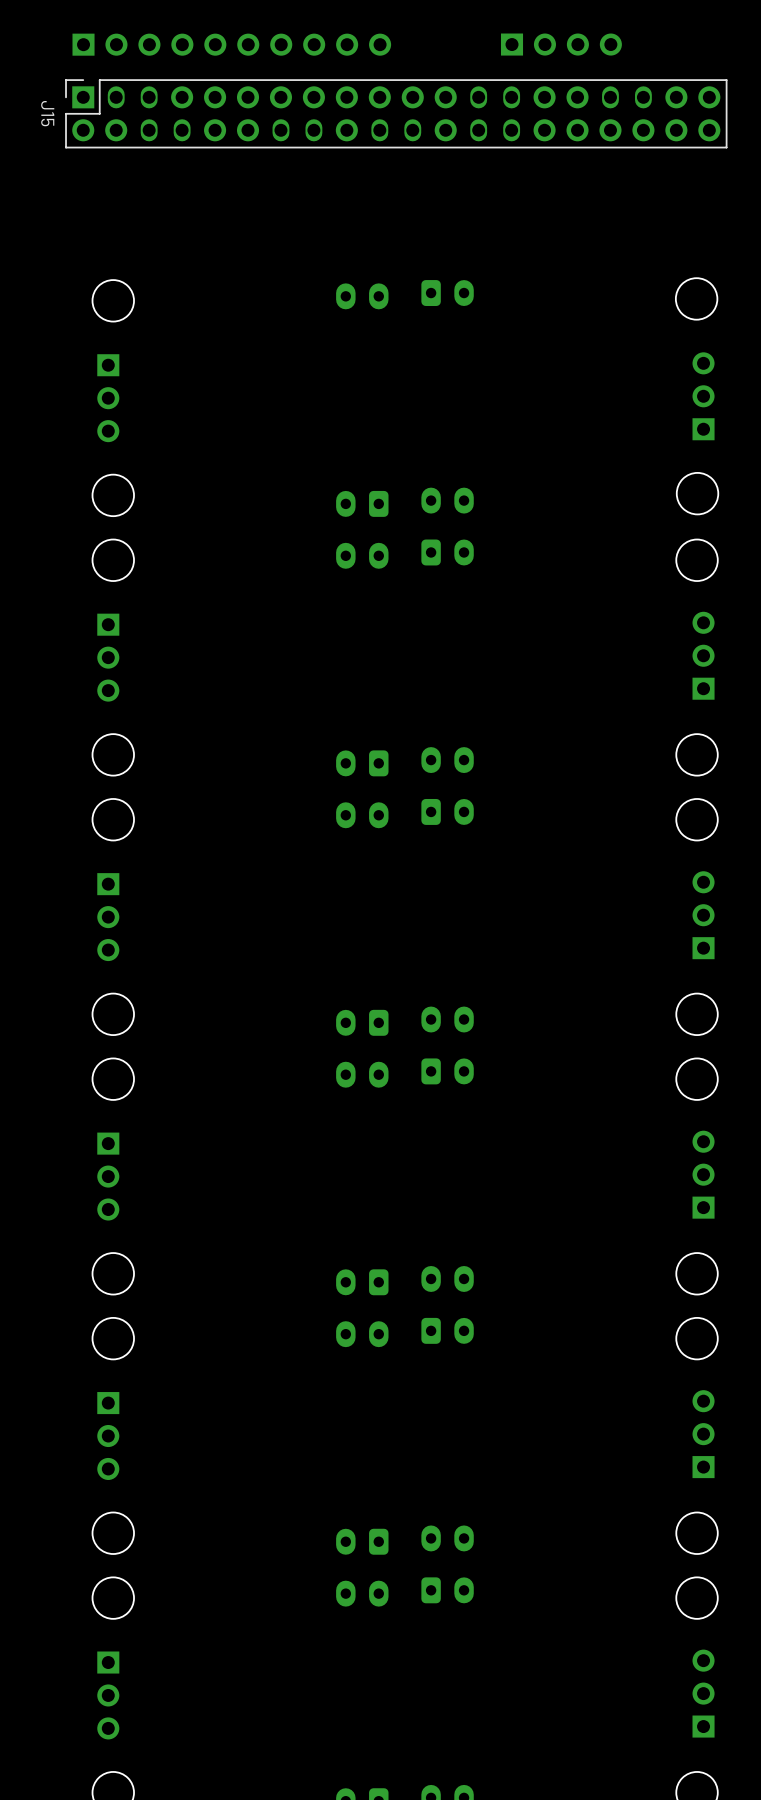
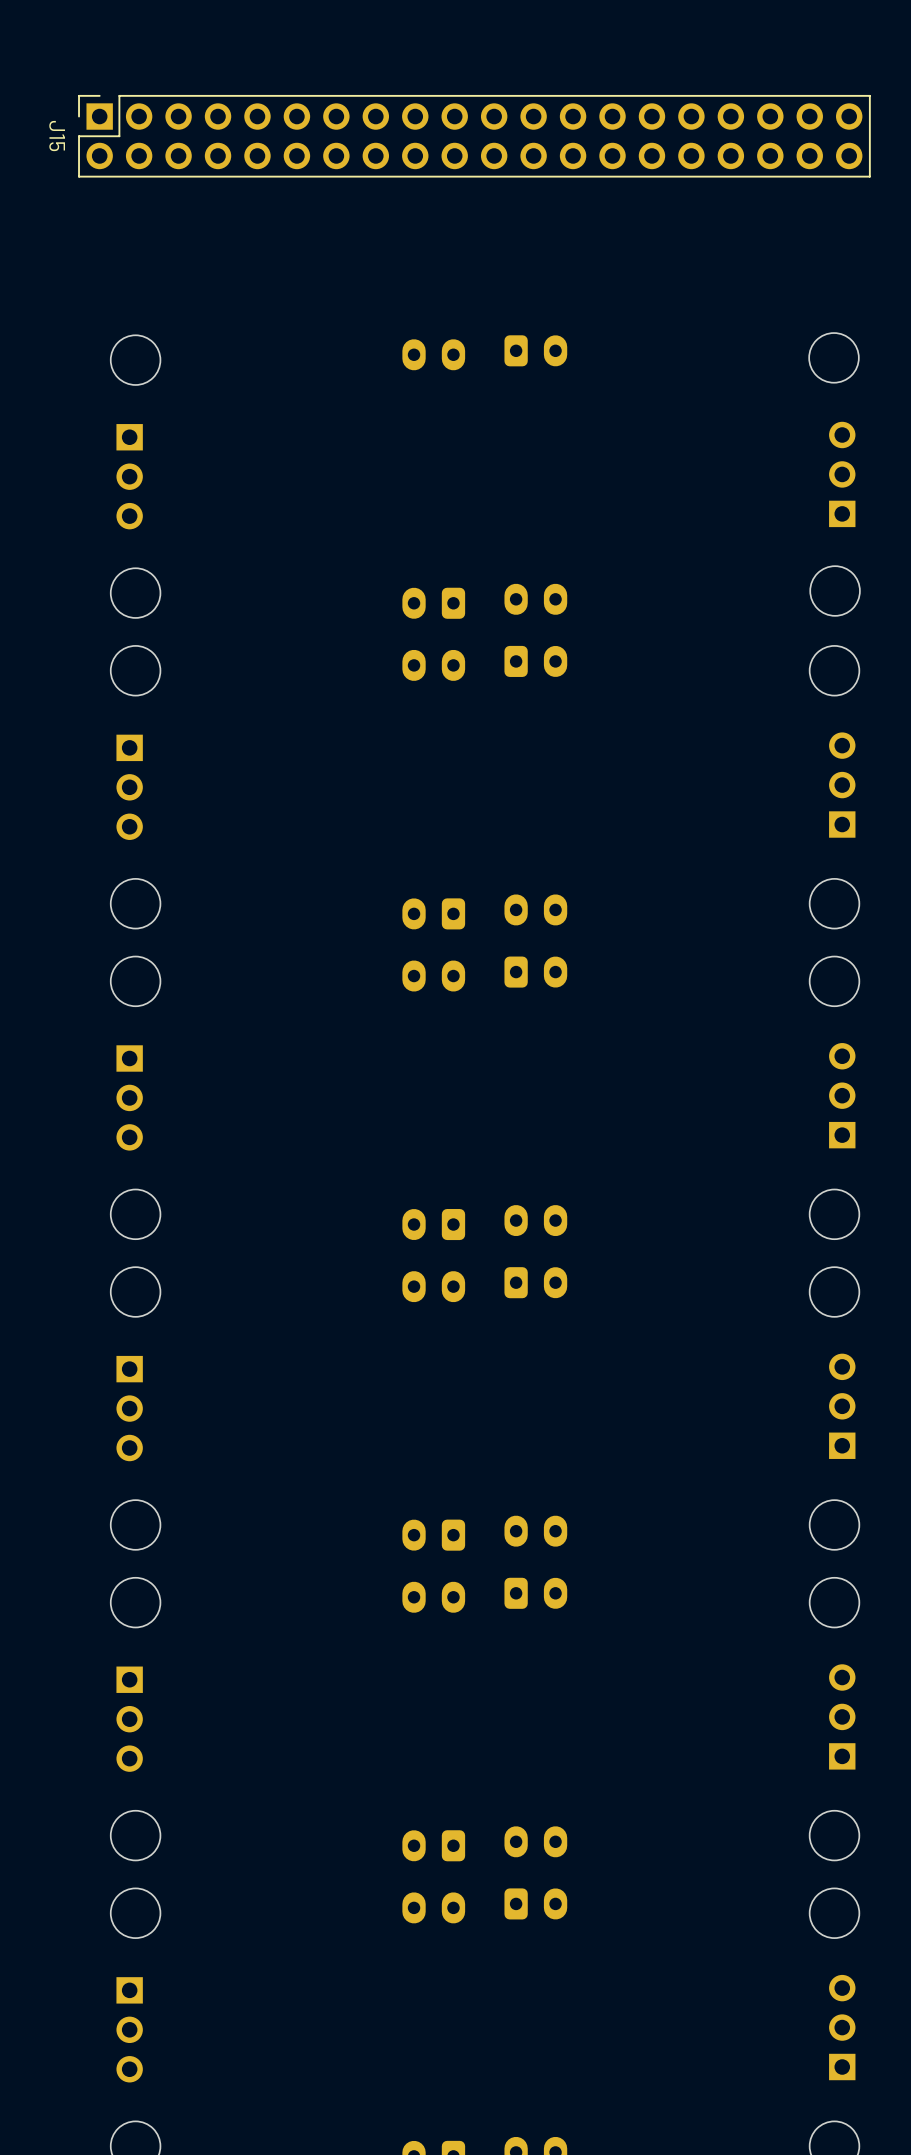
part: (231, 44) -> none
part: (561, 44) -> none
J15 footprint: [65, 79, 728, 149] -> [78, 94, 871, 178]

